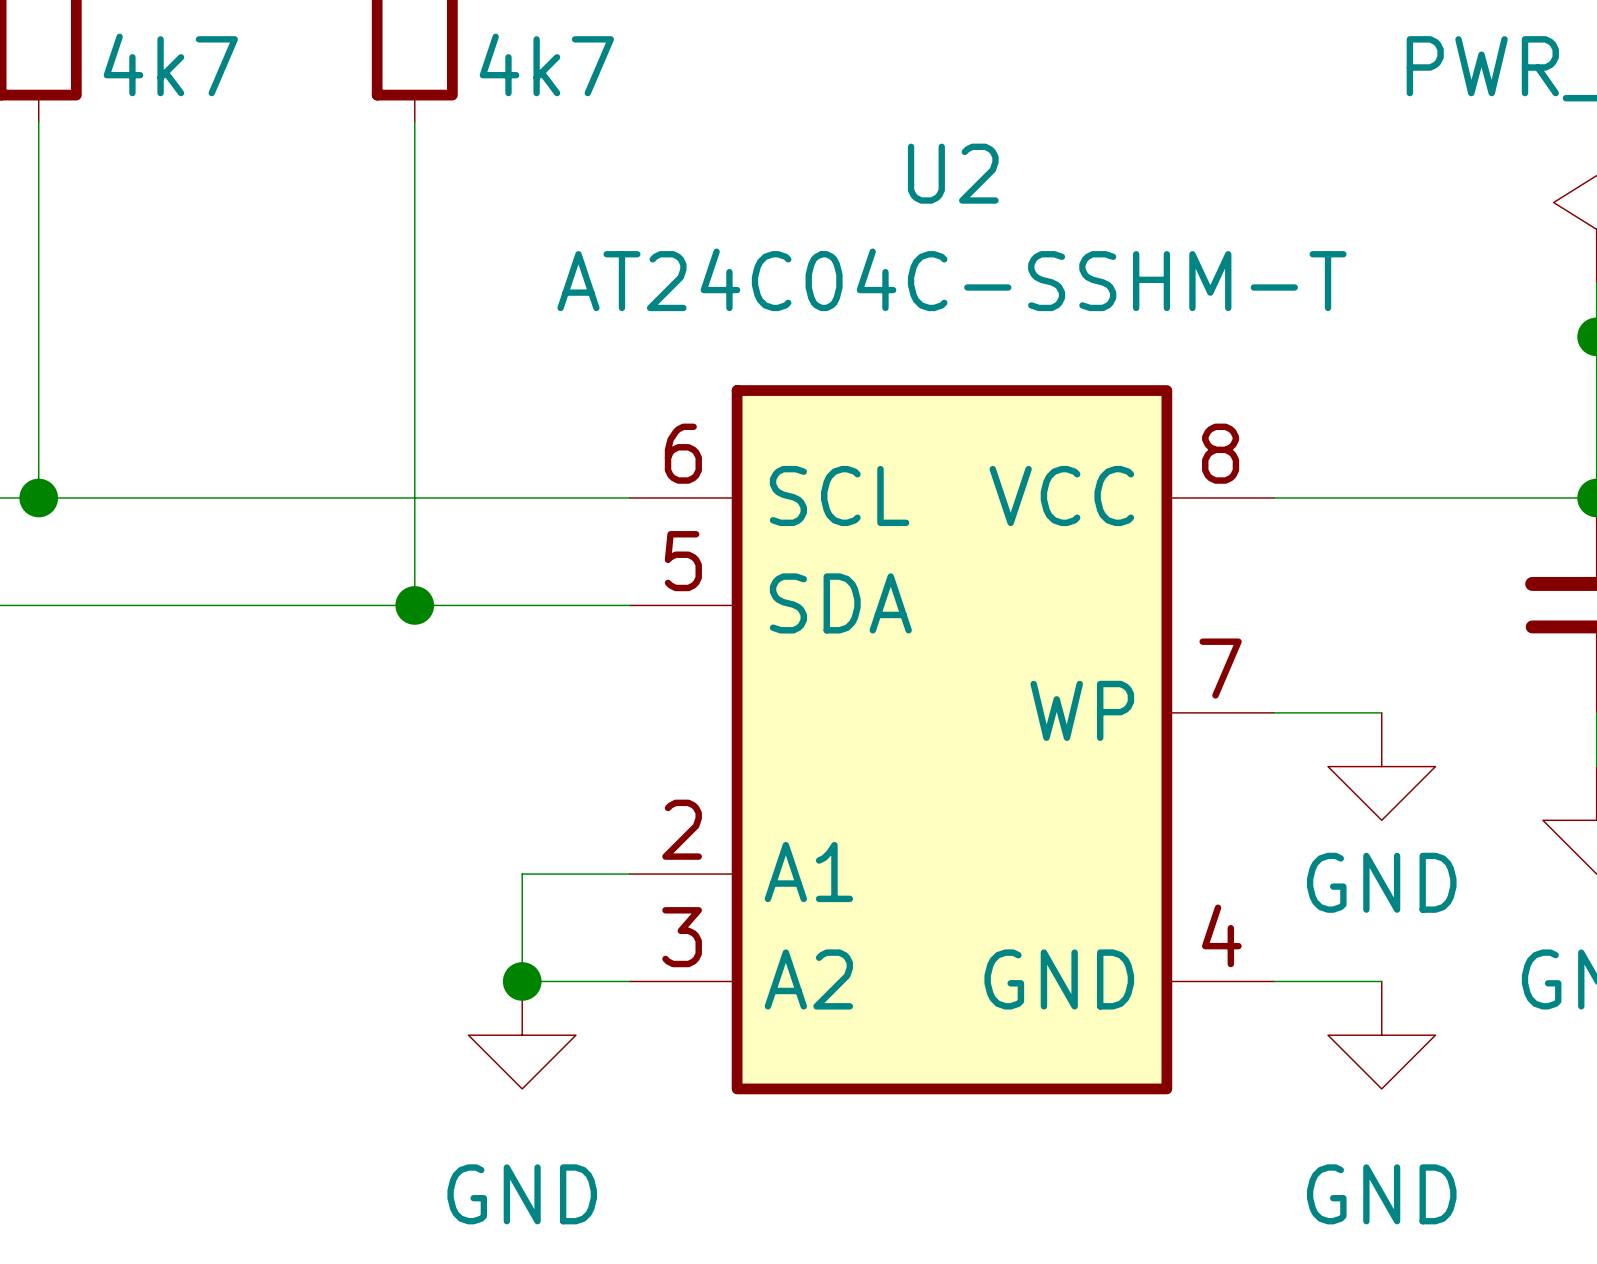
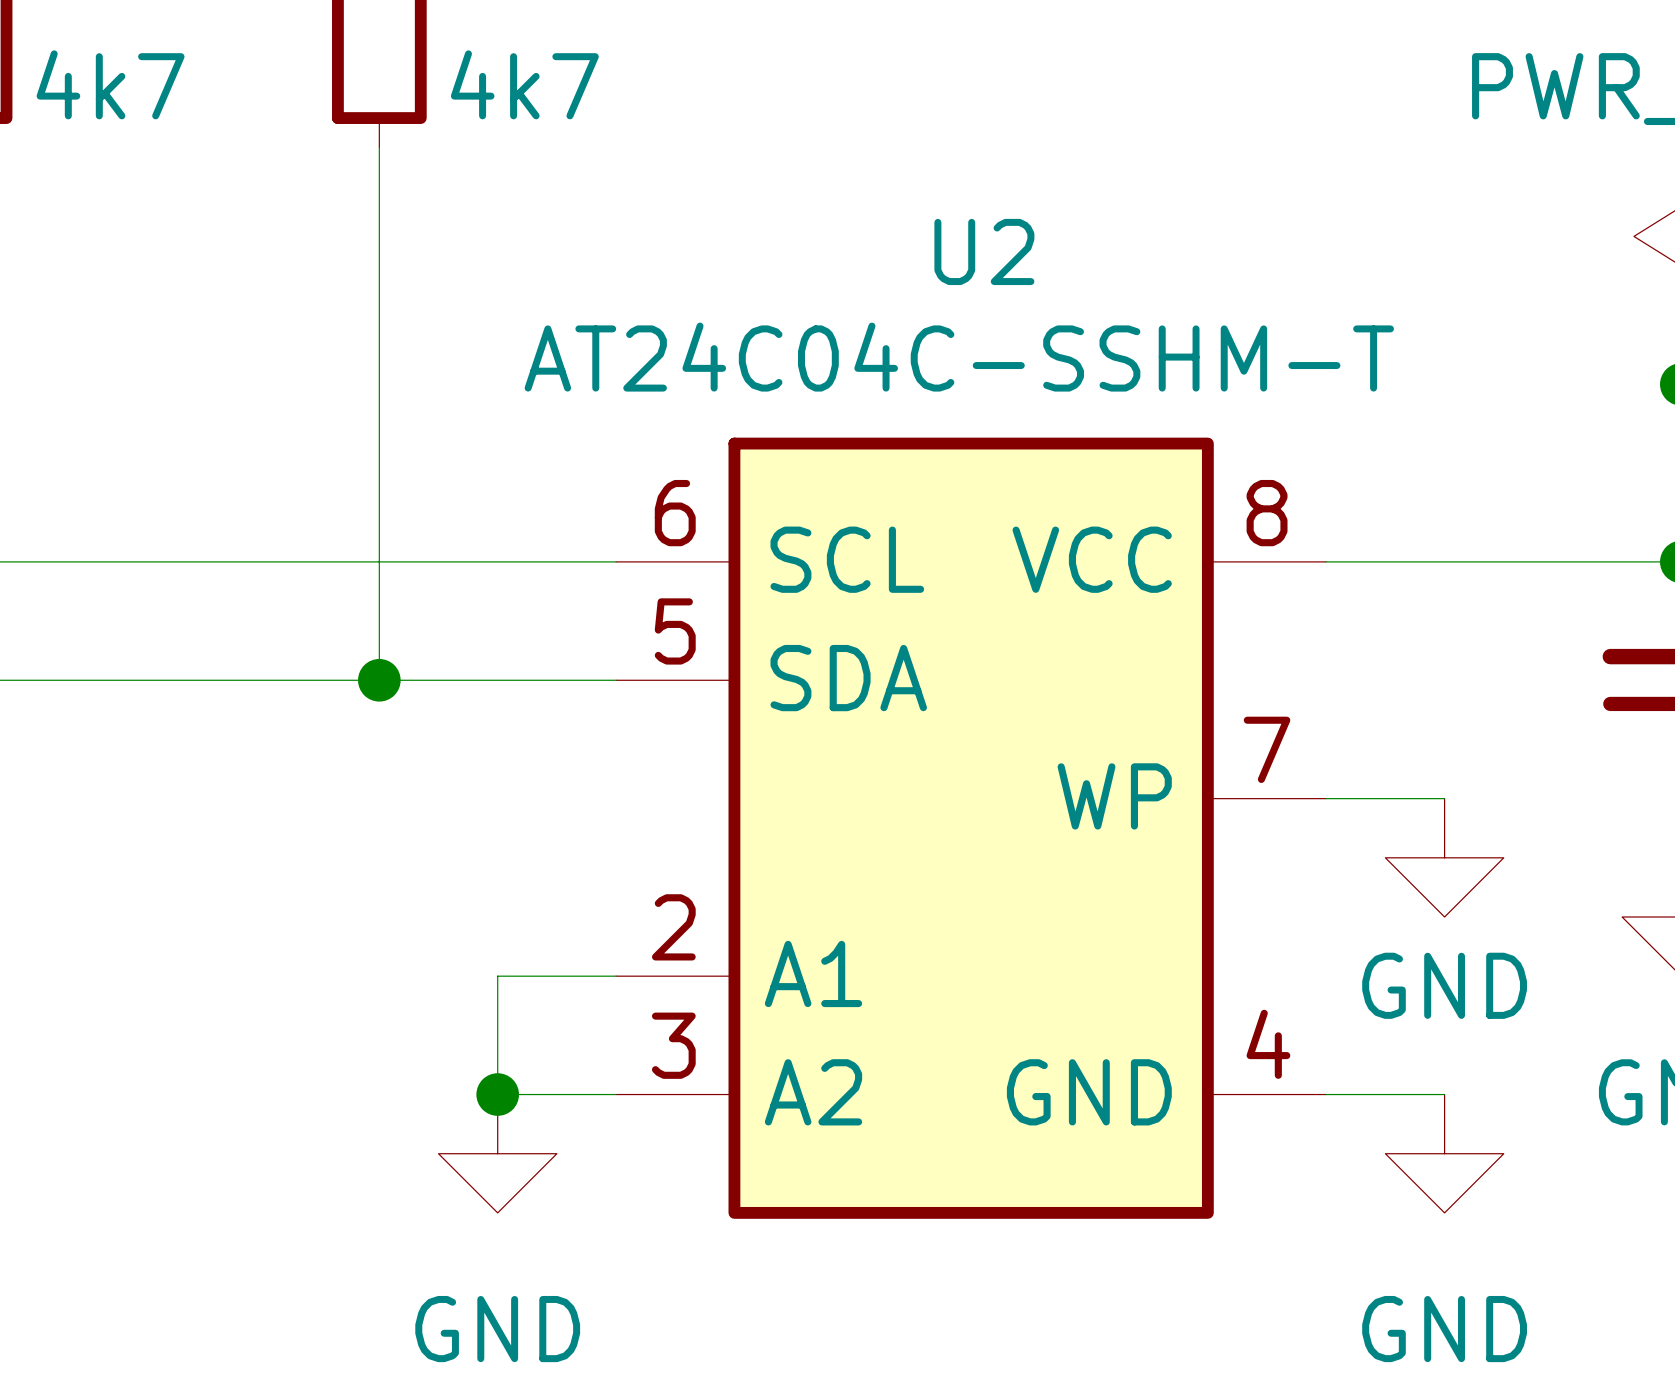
U2 name position: U2 (953, 173) -> U2 (984, 251)
U2 text position: AT24C04C-SSHM-T (951, 279) -> AT24C04C-SSHM-T (959, 357)

